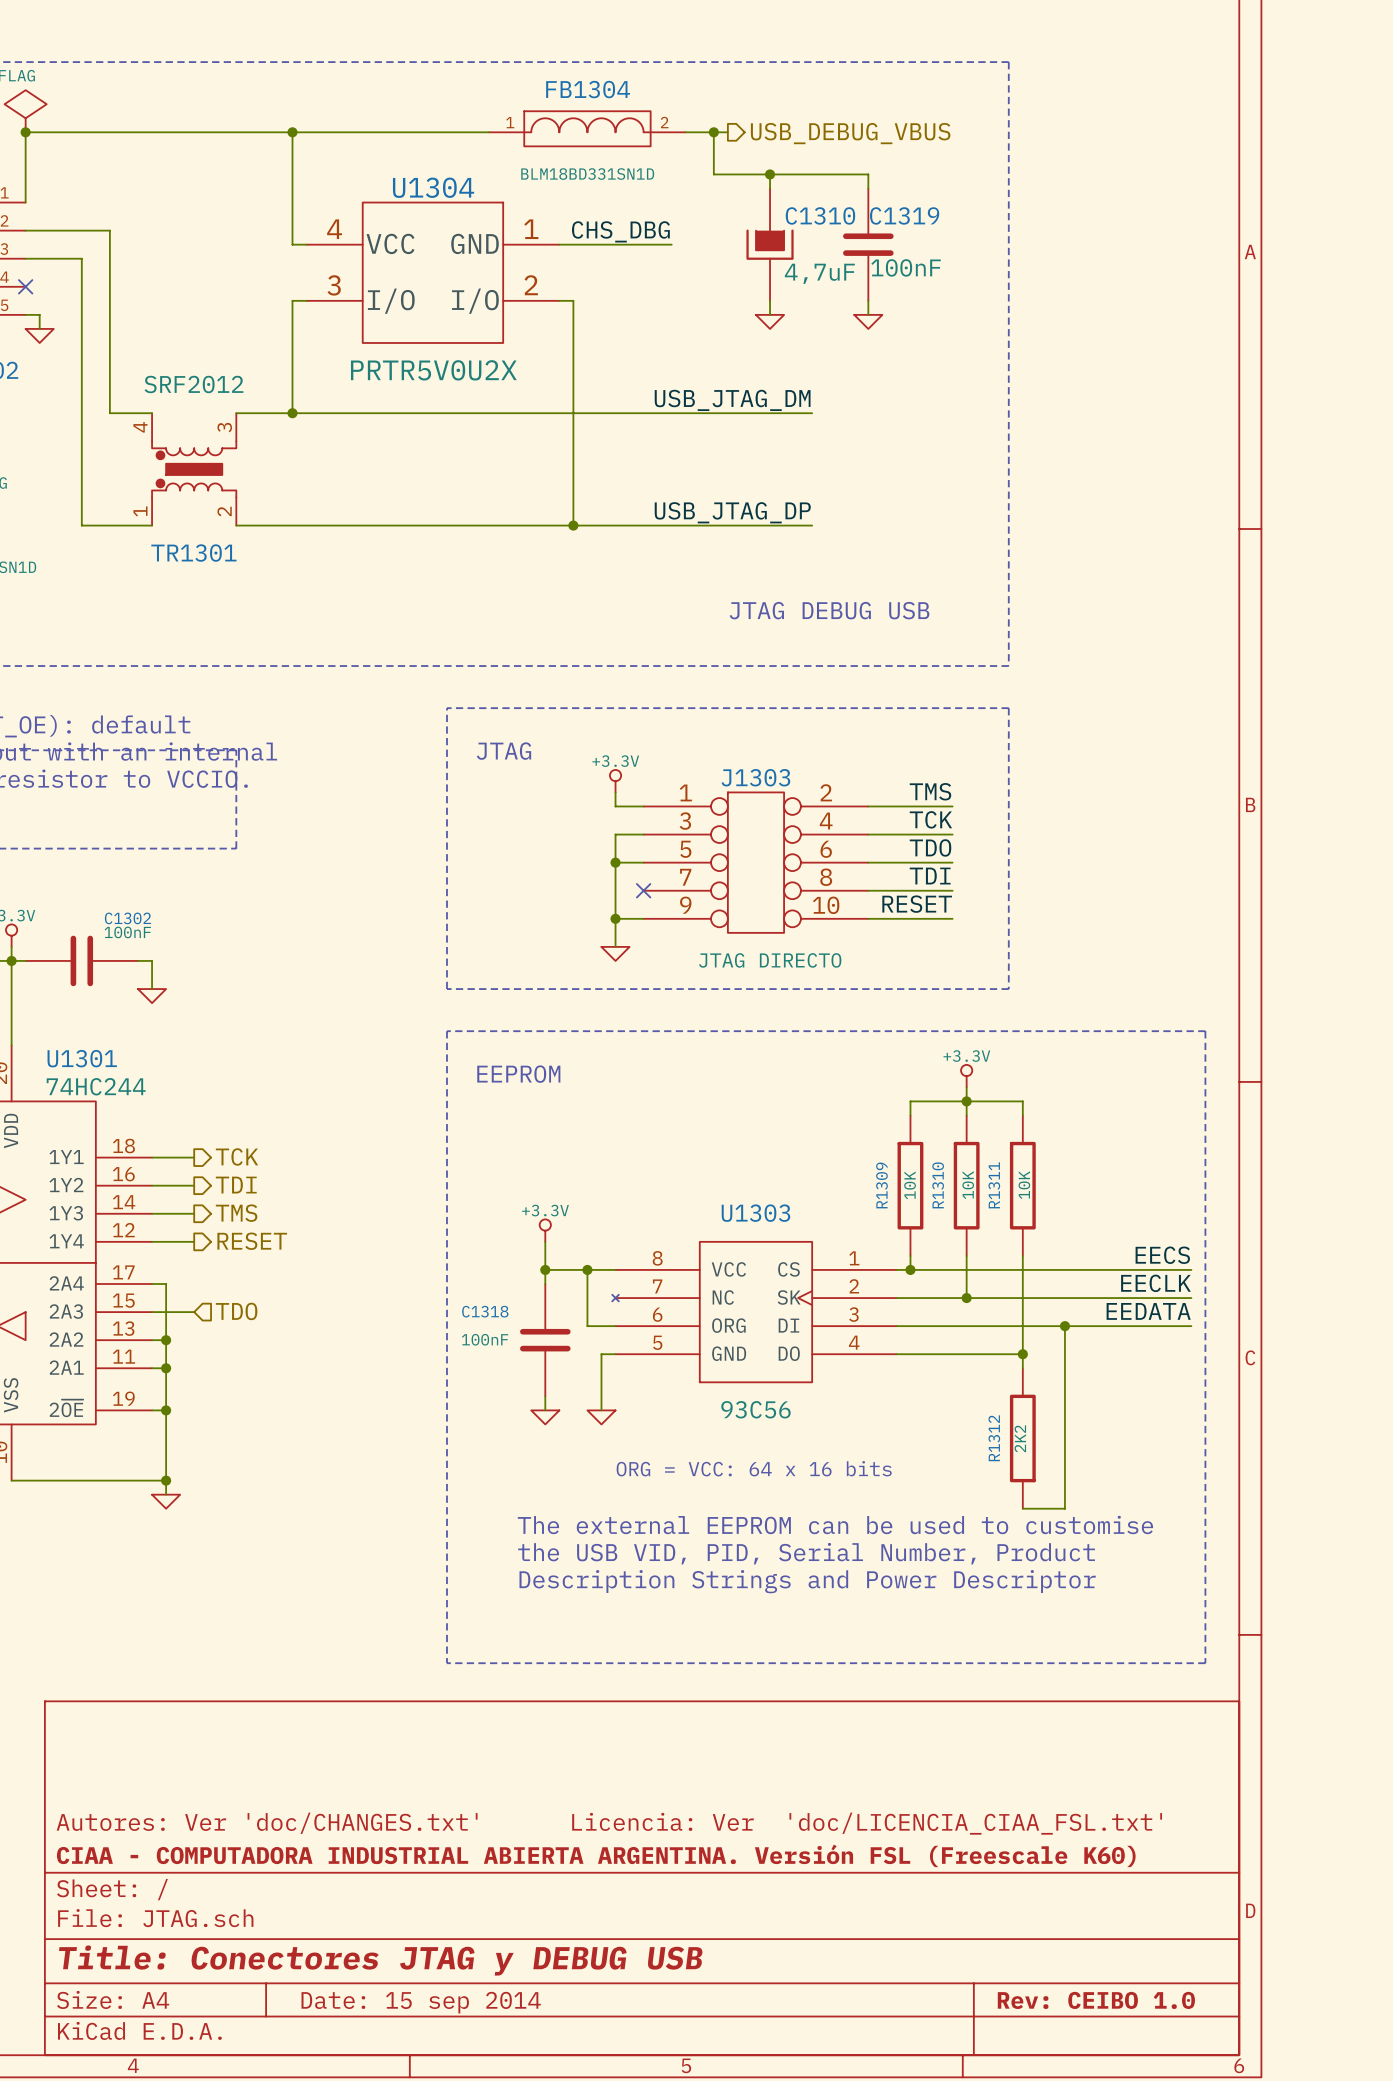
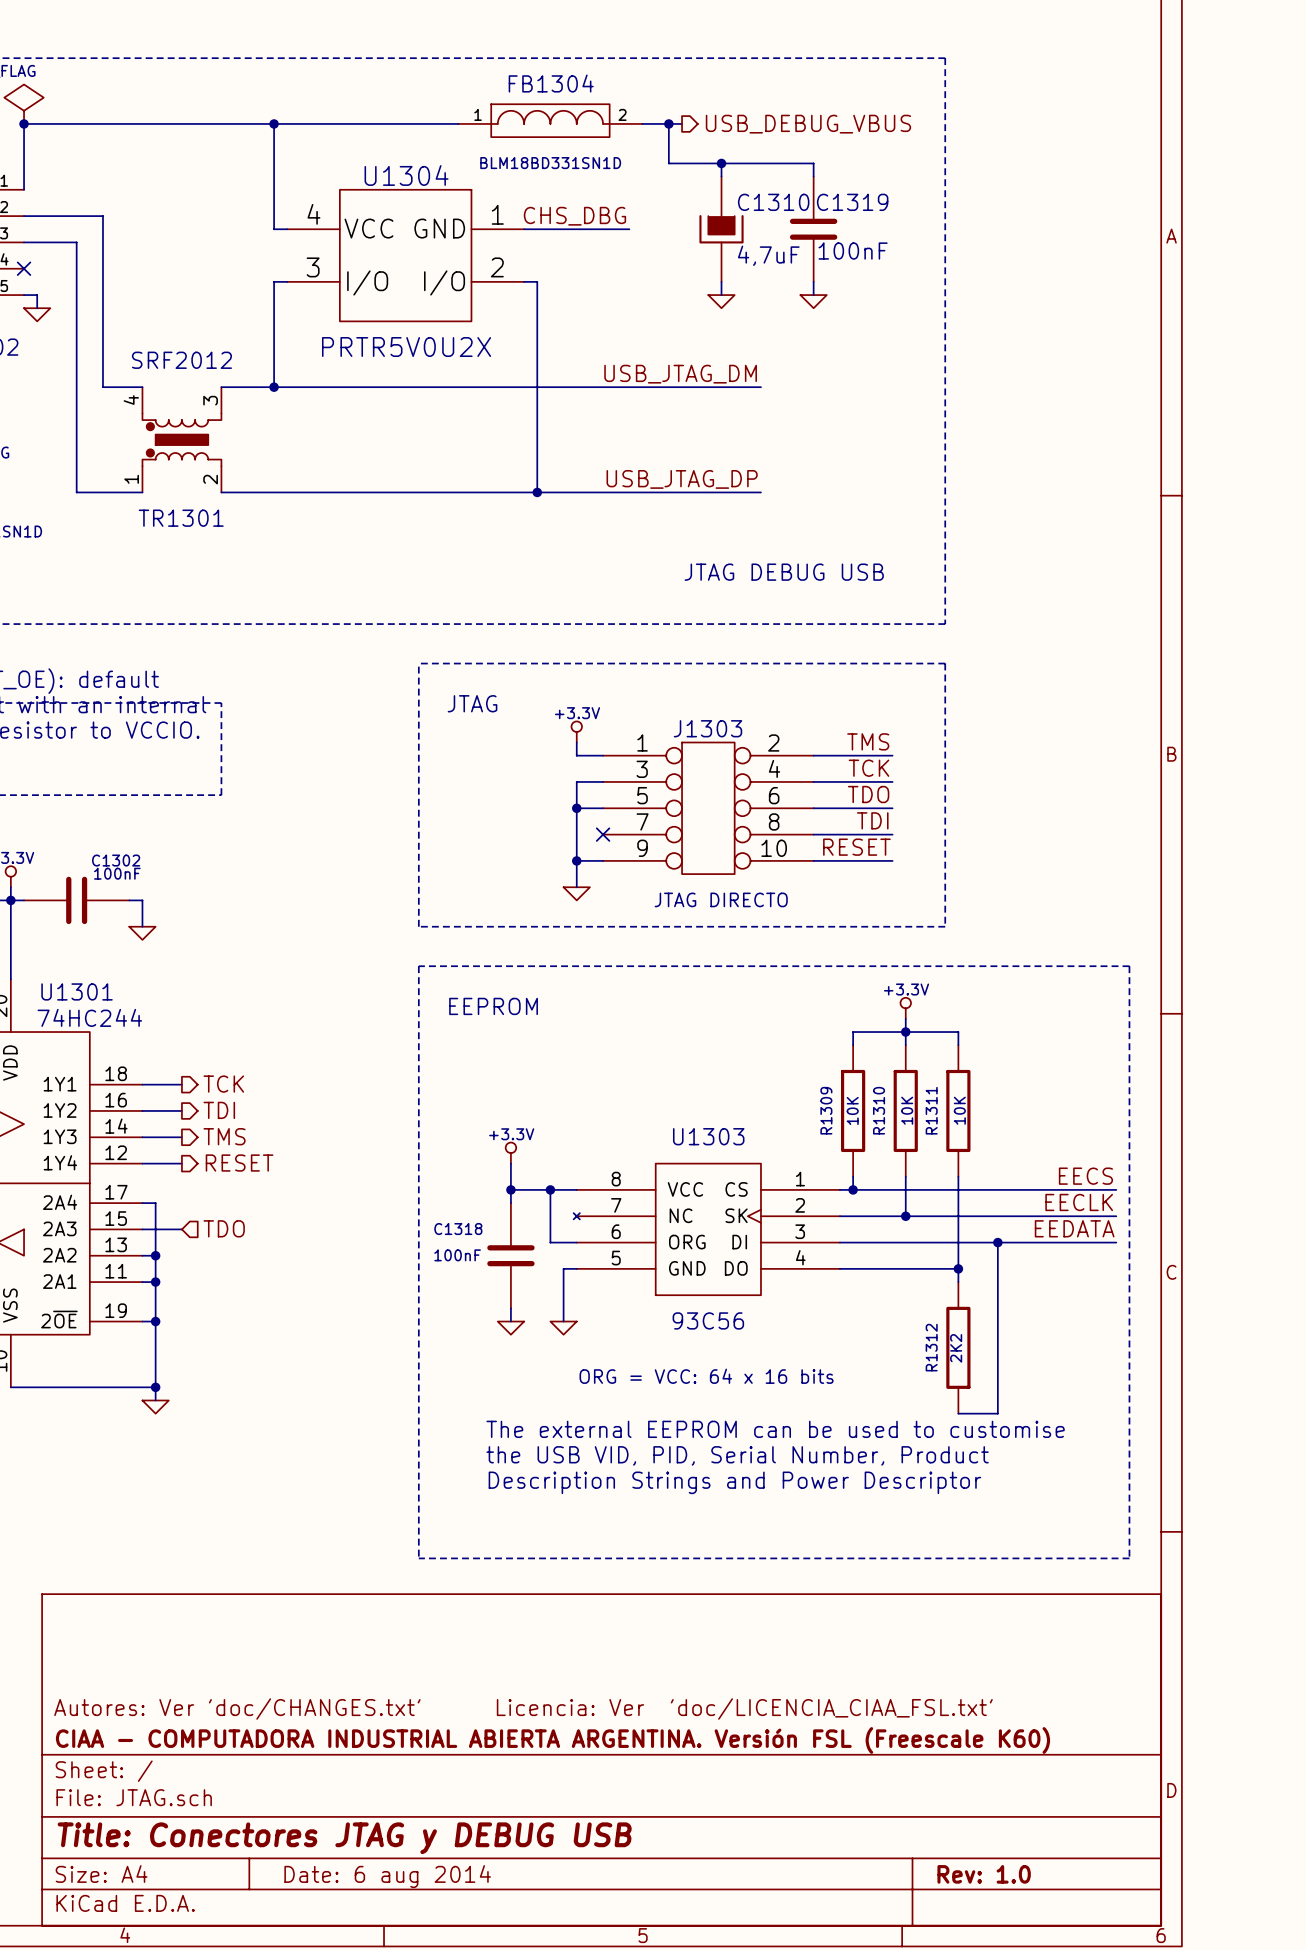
title block: Rev: CEIBO 1.0 (1096, 2000) -> Rev: 1.0 (984, 1874)
title block: Date: 15 sep 2014 (421, 2002) -> Date: 6 aug 2014 (387, 1876)

